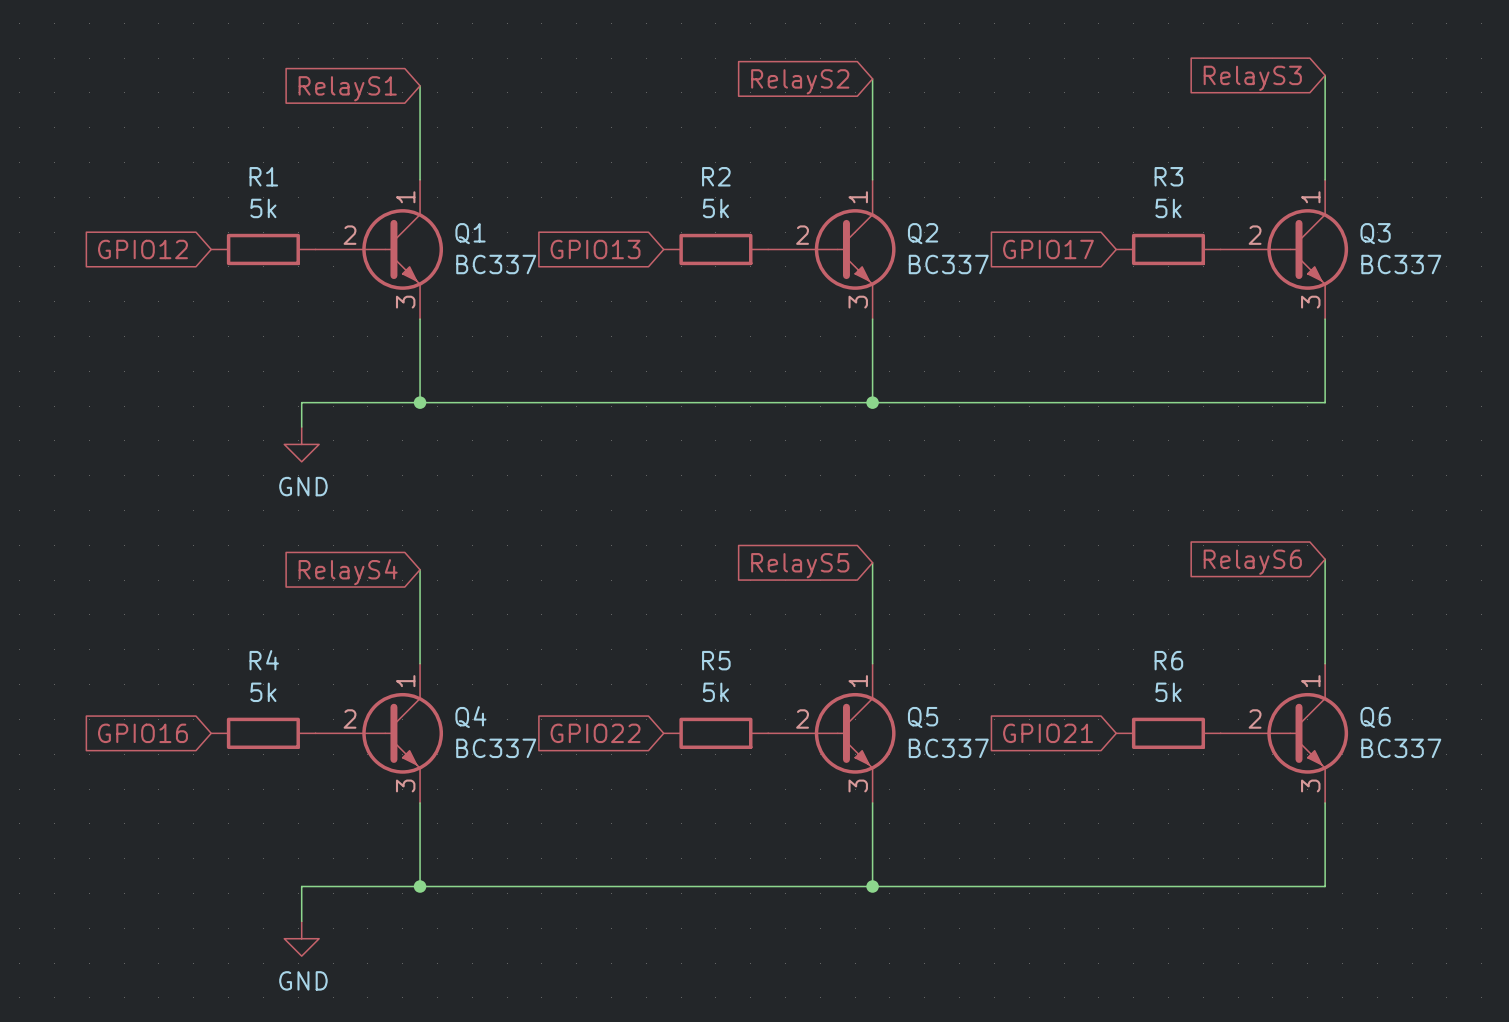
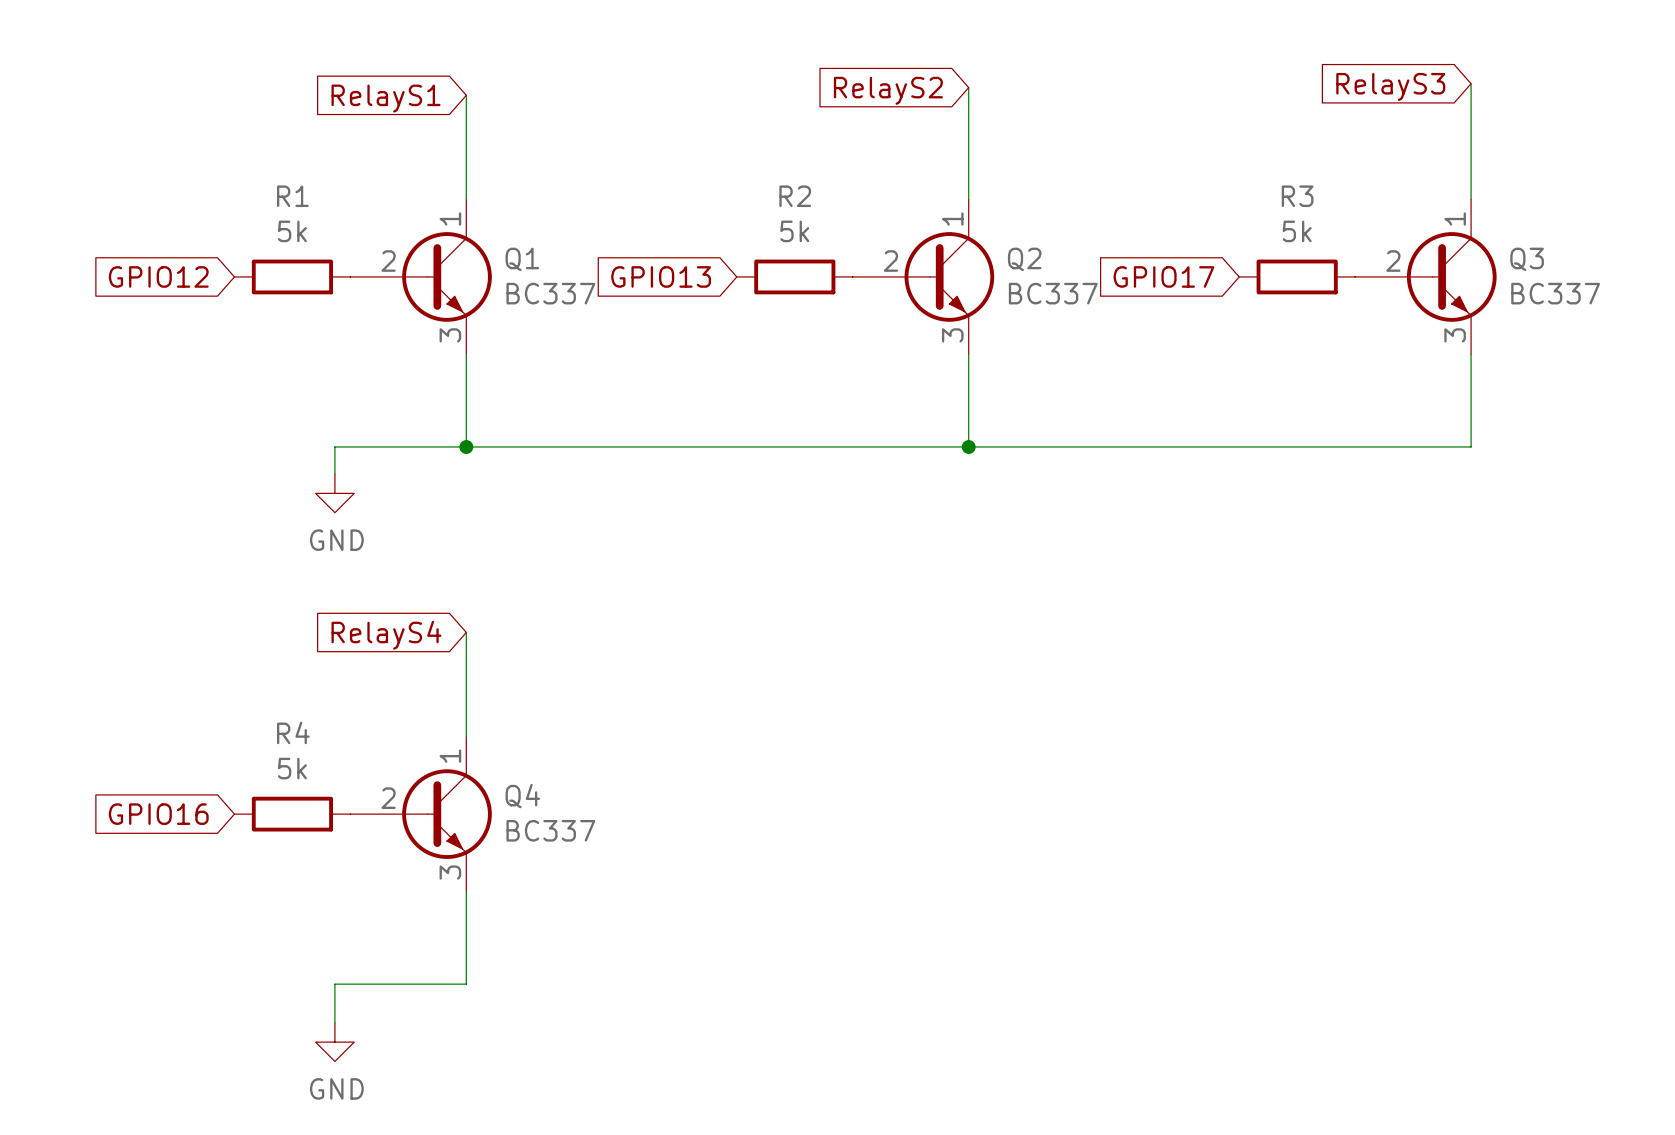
wire: (1325, 559) (1325, 663) -> none
wire: (872, 562) (872, 663) -> none
global label: RelayS6 (1252, 562) -> none
global label: RelayS5 (800, 565) -> none
global label: GPIO22 (595, 733) -> none
R5: 5k (715, 733) -> none
Q5: BC337 (831, 733) -> none
global label: GPIO21 (1048, 733) -> none
R6: 5k (1168, 733) -> none
Q6: BC337 (1284, 733) -> none
wire: (872, 802) (872, 886) -> none
wire: (1325, 802) (1325, 886) (420, 886) -> none
junction: (420, 886) -> none
junction: (872, 886) -> none

